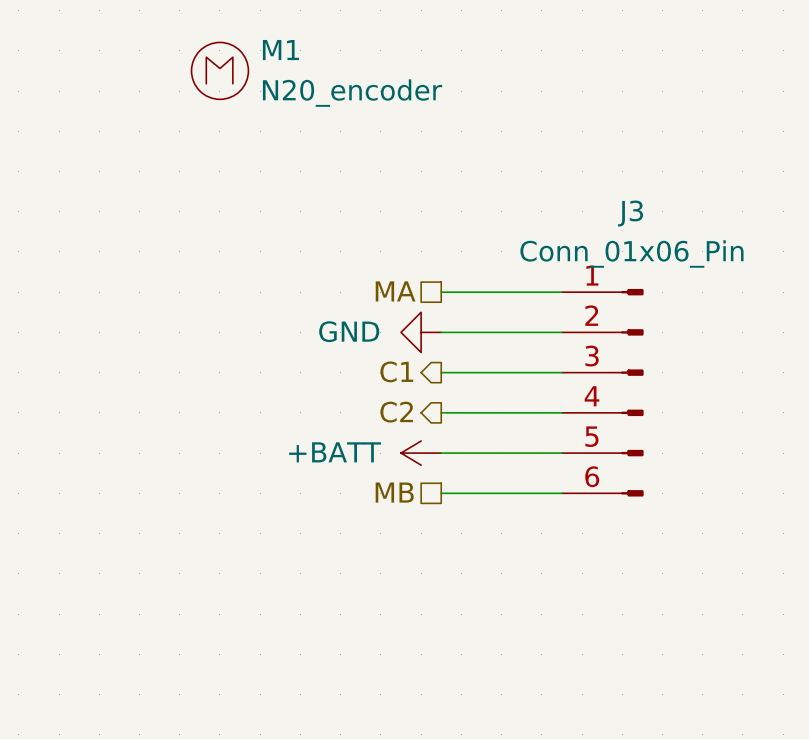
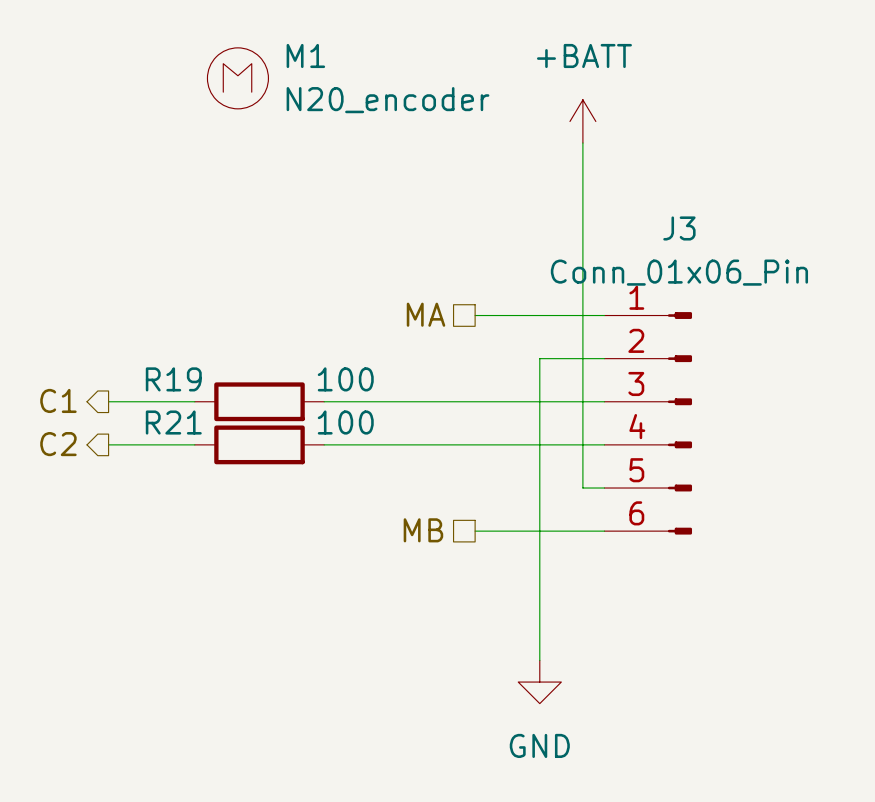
power symbol rotation: 0° (421, 332) -> 90° counterclockwise (539, 682)
power symbol position: GND (421, 332) -> GND (539, 682)
wire: (441, 332) (501, 332) -> (539, 660) (539, 358)
hierarchical label position: C1 (396, 371) -> C1 (58, 400)
wire: none -> (108, 401) (194, 401)
R19: none -> 100 (259, 401)
wire: none -> (324, 401) (475, 401)
wire: none -> (108, 444) (194, 444)
R21: none -> 100 (259, 444)
wire: none -> (324, 444) (475, 444)
hierarchical label position: C2 (396, 412) -> C2 (58, 444)
power symbol text position: +BATT (335, 452) -> +BATT (584, 55)
power symbol rotation: 0° (421, 453) -> 90° clockwise (582, 121)
power symbol position: +BATT (421, 453) -> +BATT (582, 121)
wire: (441, 453) (541, 453) -> (582, 143) (582, 488)

